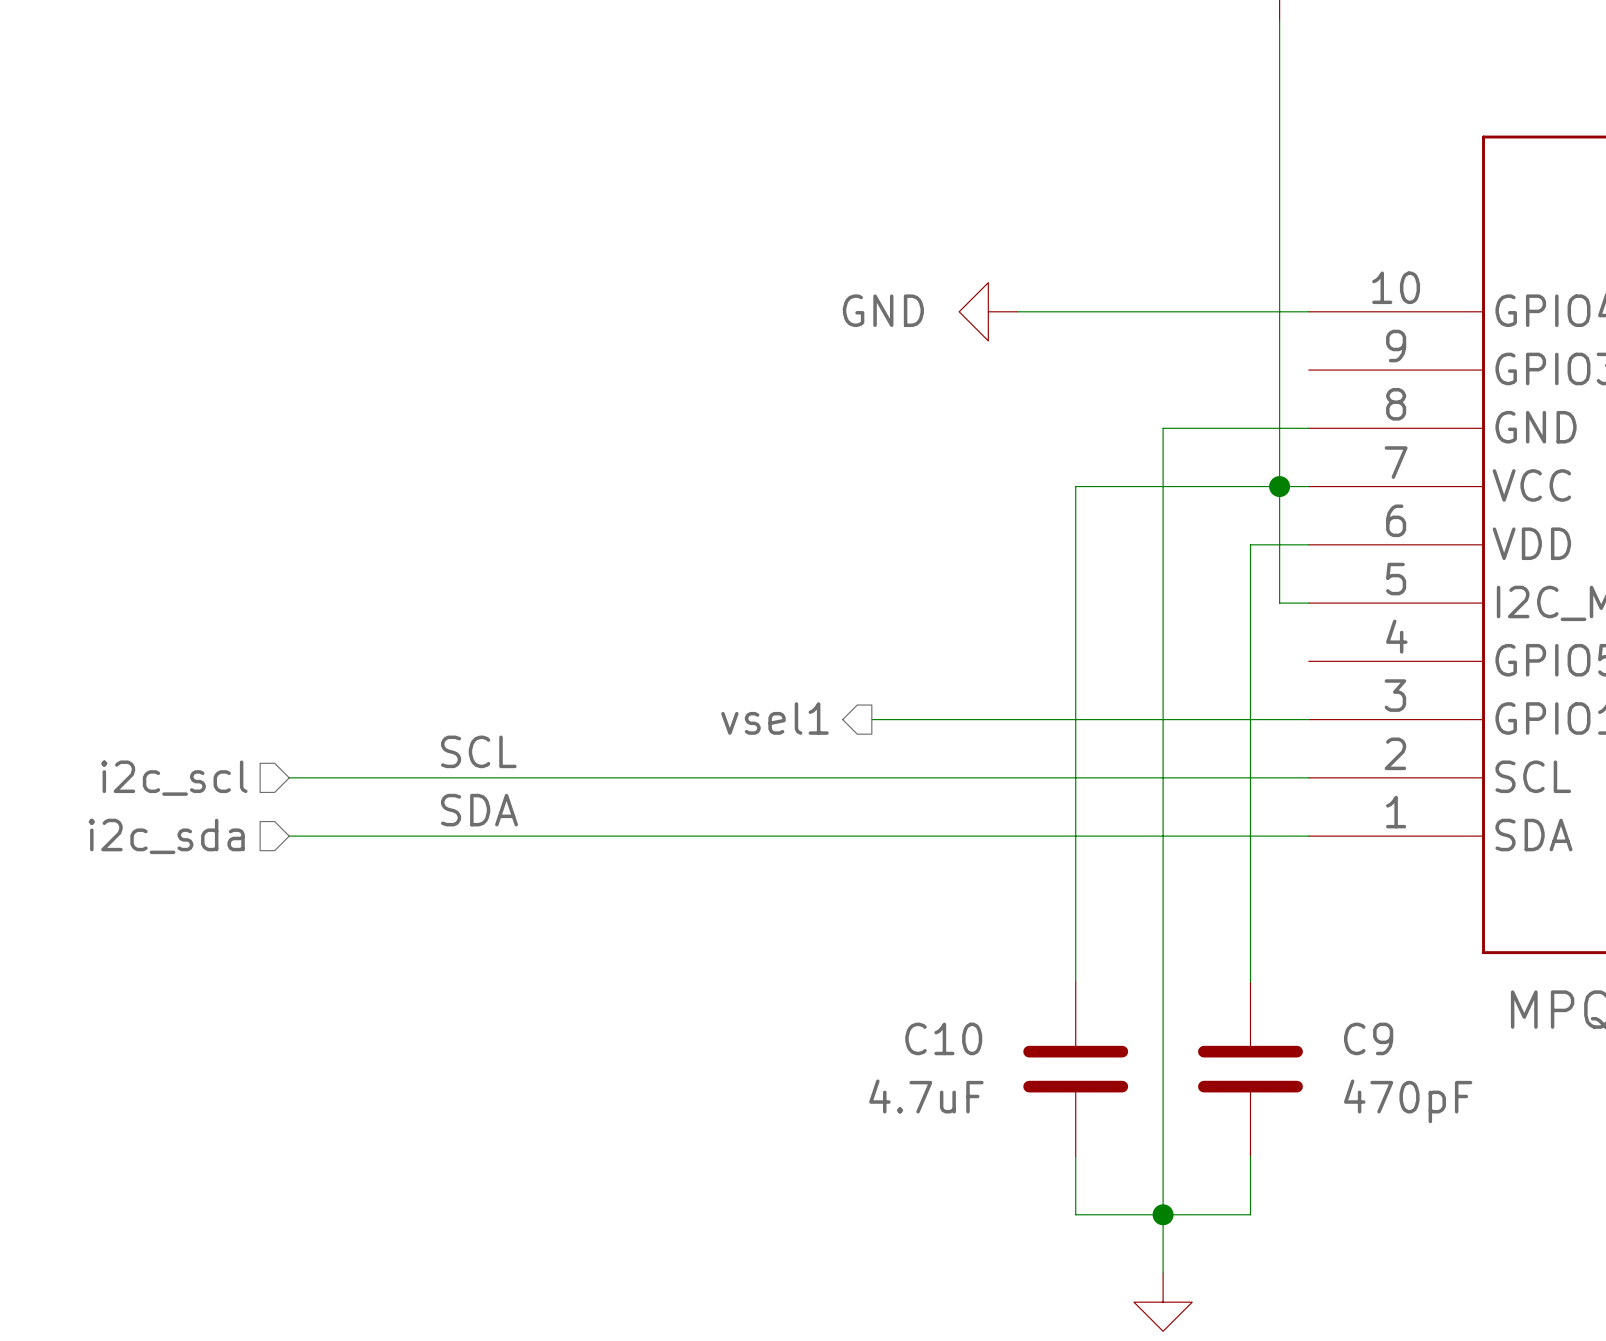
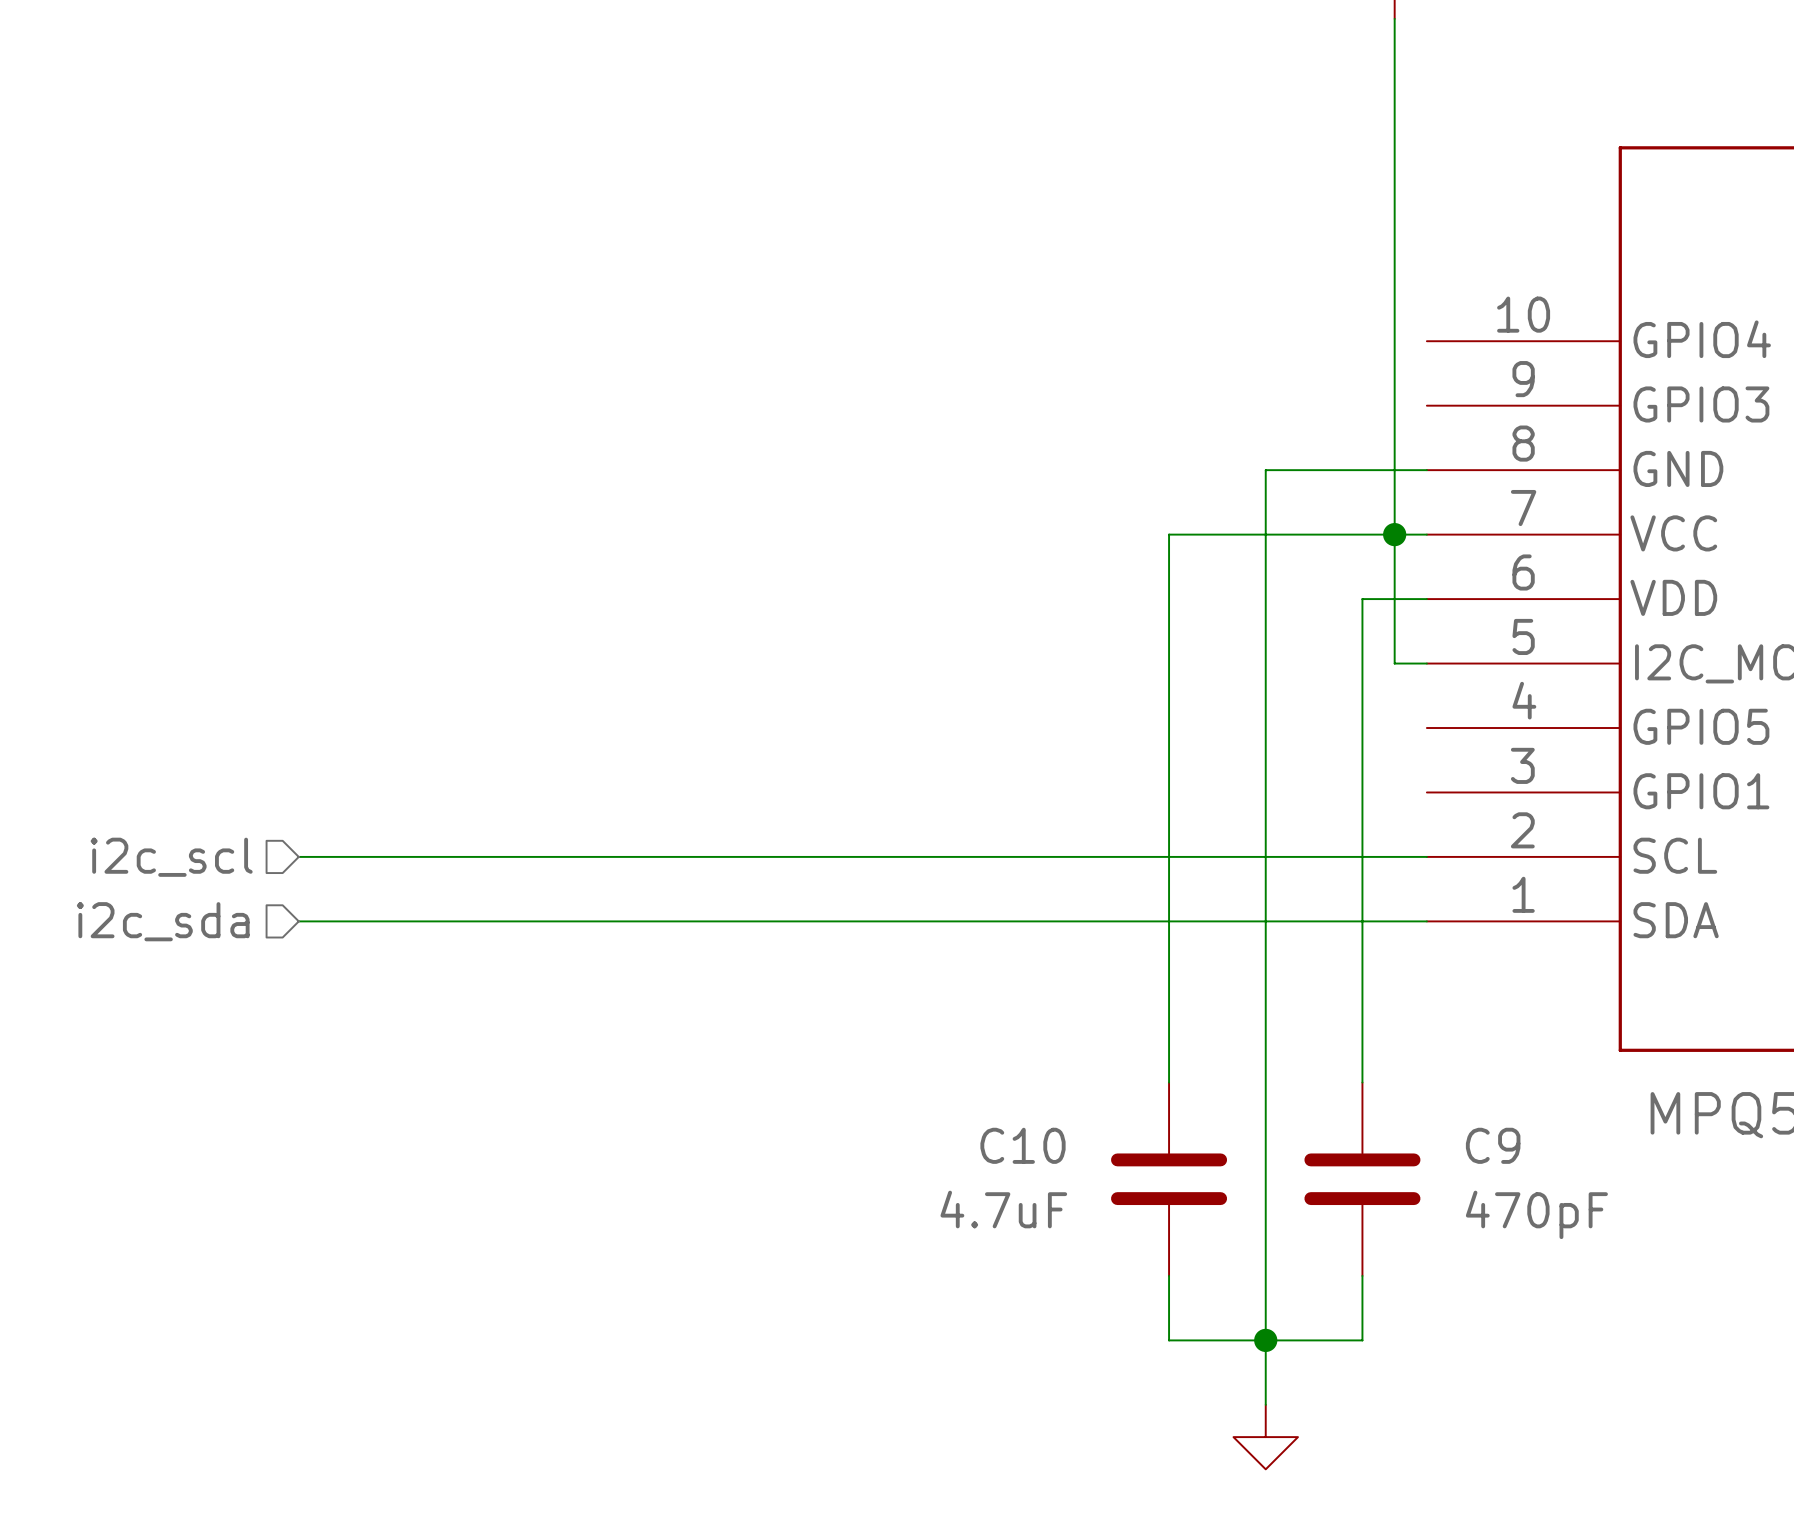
power symbol: GND (988, 311) -> none
wire: (1017, 311) (1308, 311) -> none
hierarchical label: vsel1 (774, 718) -> none
wire: (871, 719) (1308, 719) -> none
label: SCL (478, 751) -> none
label: SDA (479, 810) -> none

